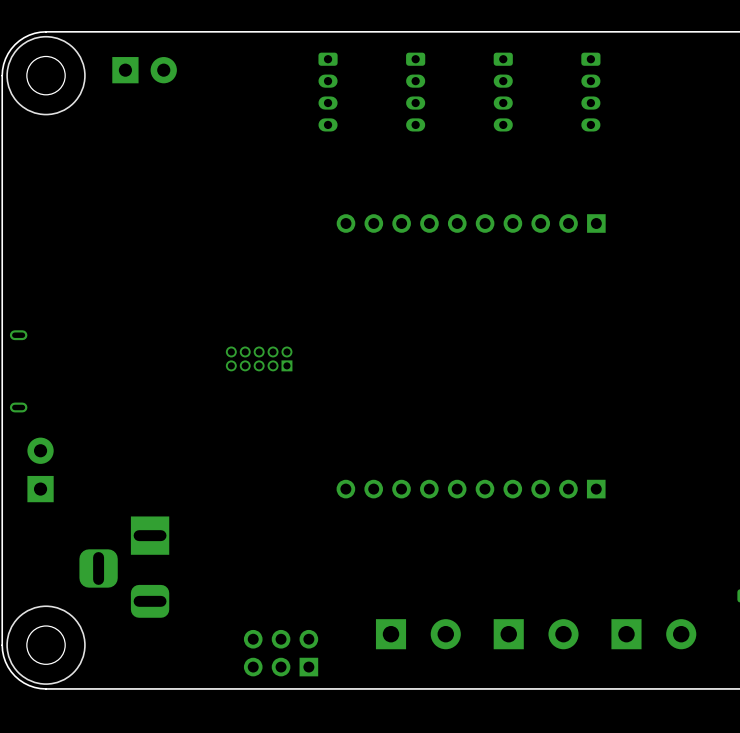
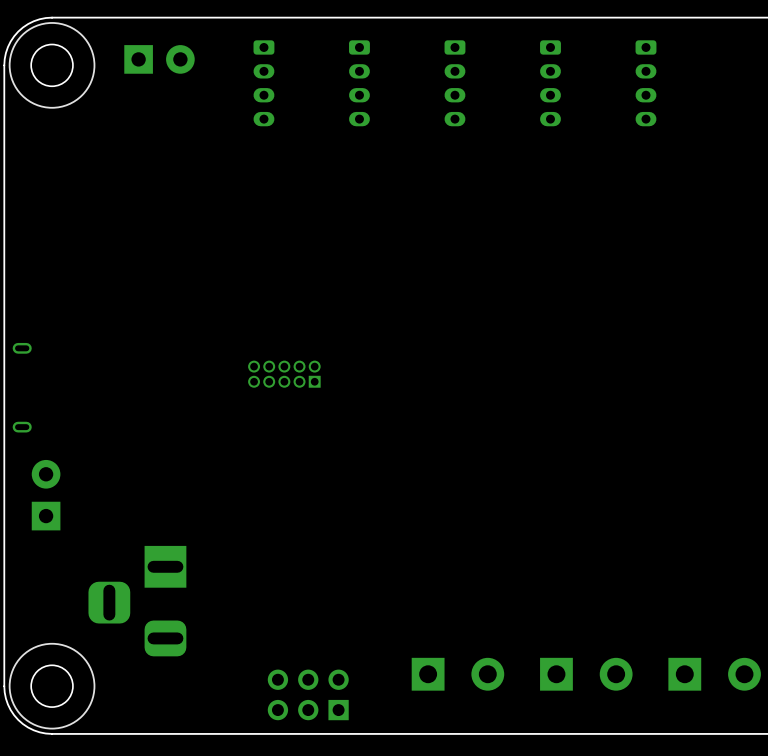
part: none -> (263, 83)
part: (471, 223) -> none
part: (471, 489) -> none

